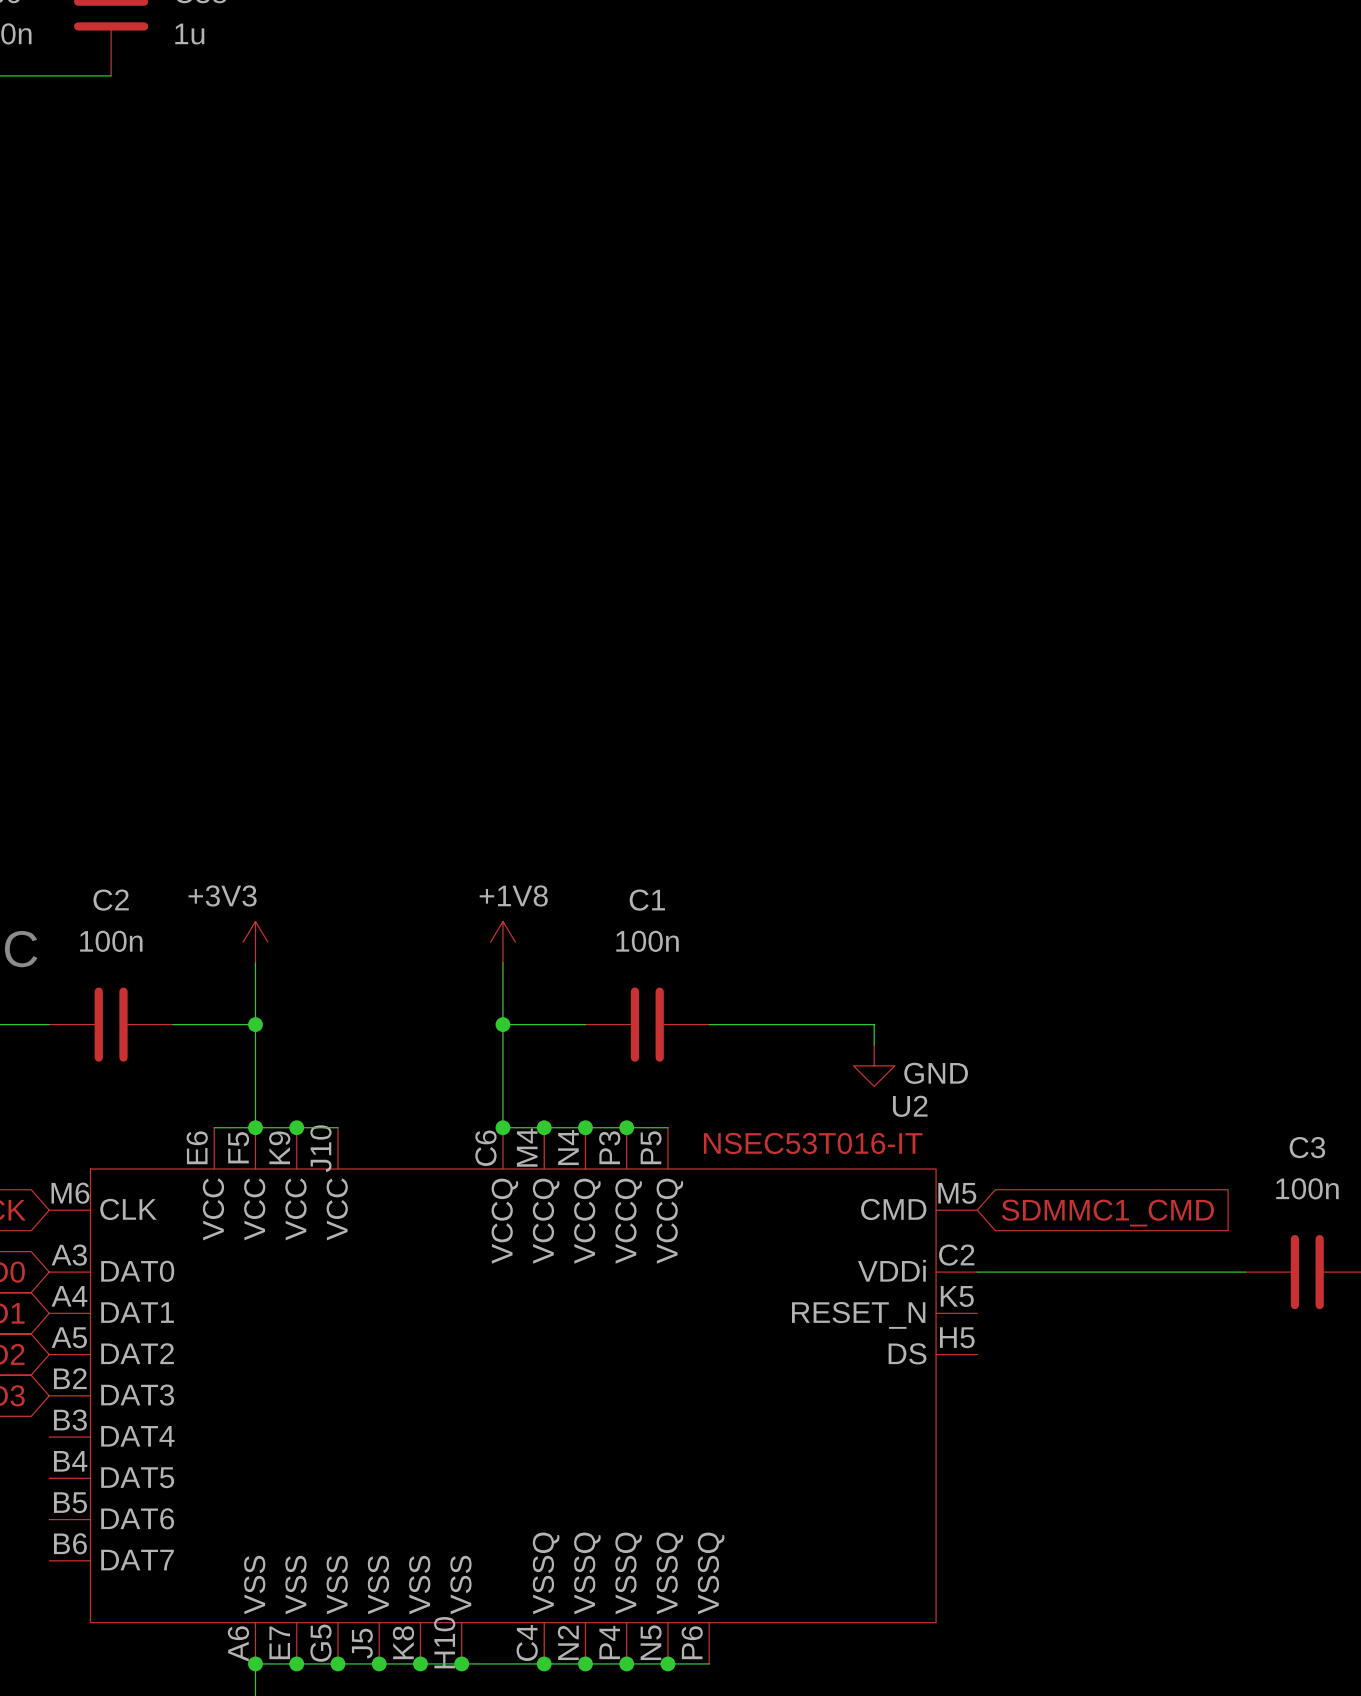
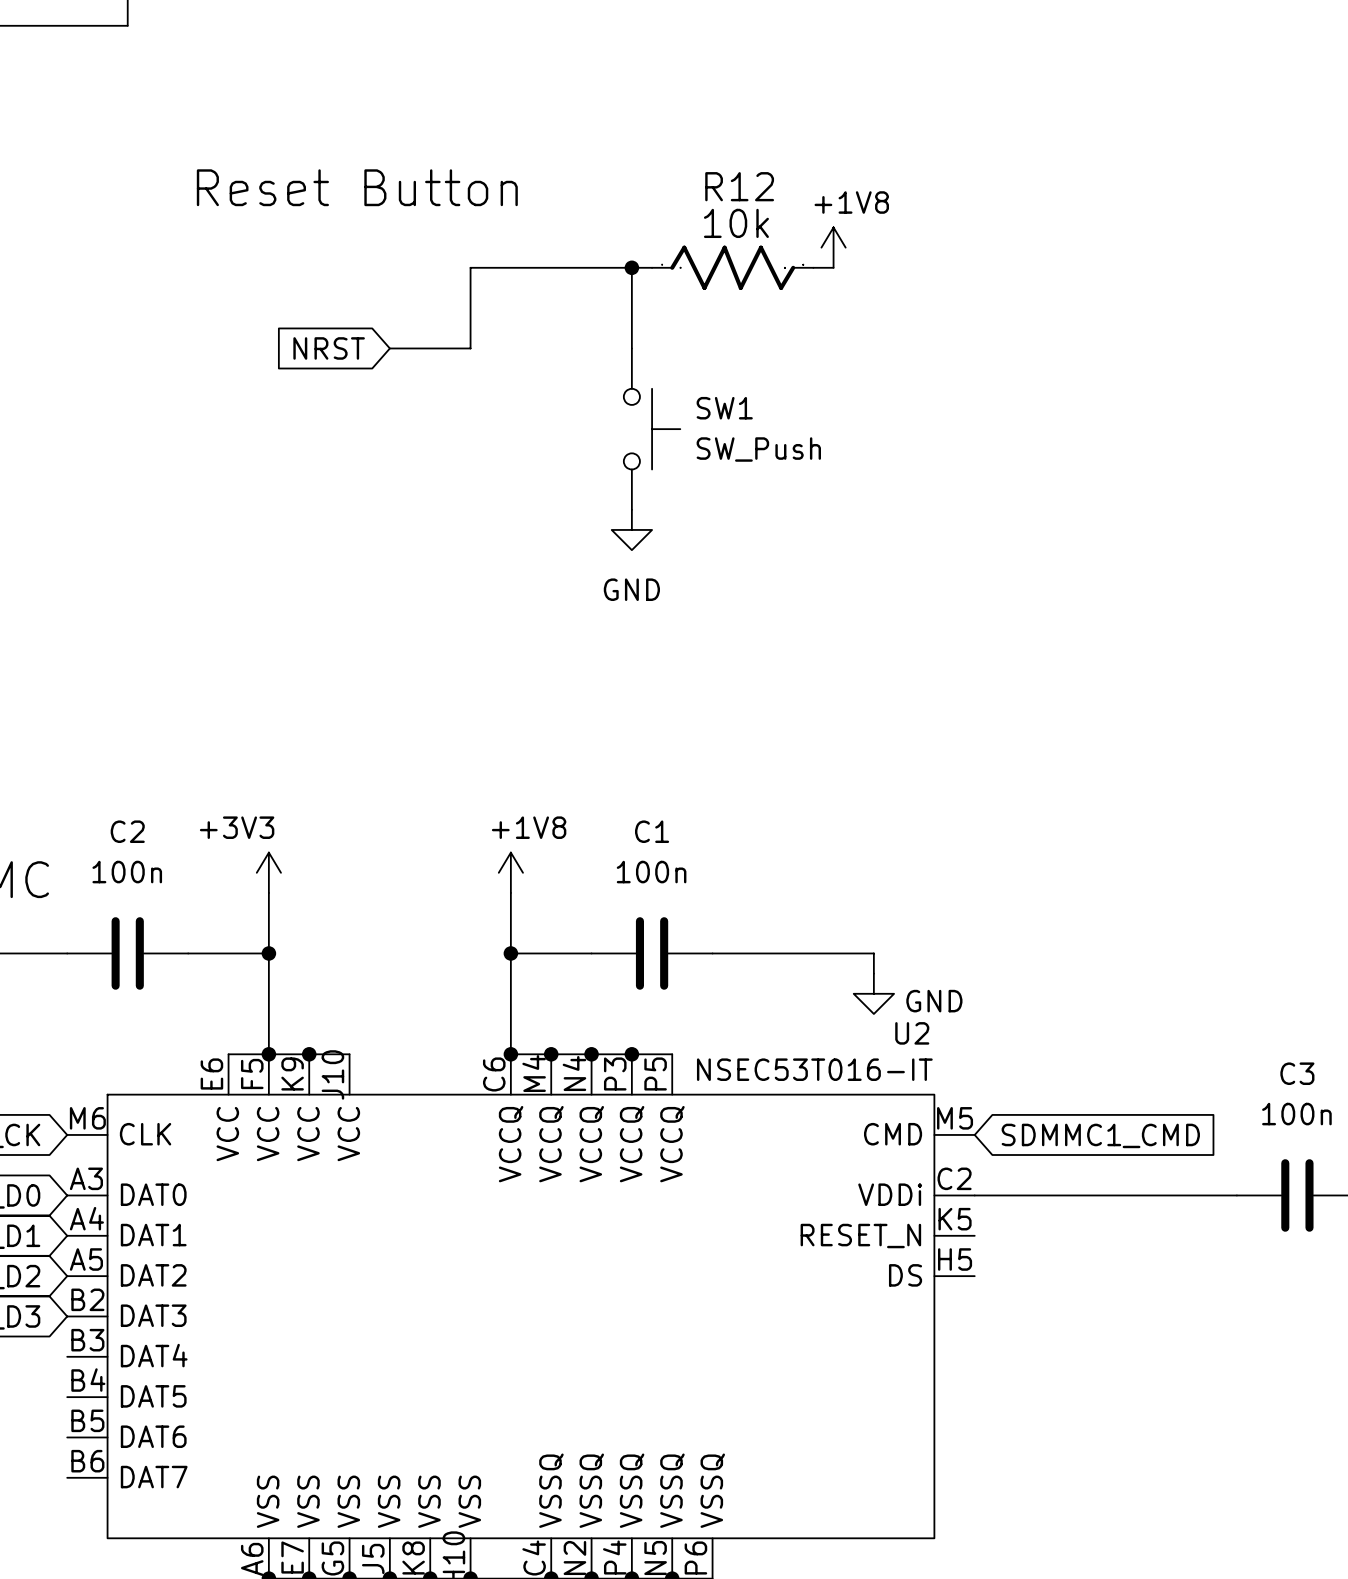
text: none -> Reset Button (357, 187)
power symbol: none -> +1V8 (833, 247)
wire: none -> (631, 267) (631, 348)
junction: none -> (631, 267)
wire: none -> (652, 267) (470, 267) (470, 348) (389, 348)
R12: none -> 10k (732, 267)
wire: none -> (813, 267) (833, 267)
global label: none -> NRST (329, 348)
SW1: none -> SW_Push (652, 429)
power symbol: none -> GND (631, 529)

